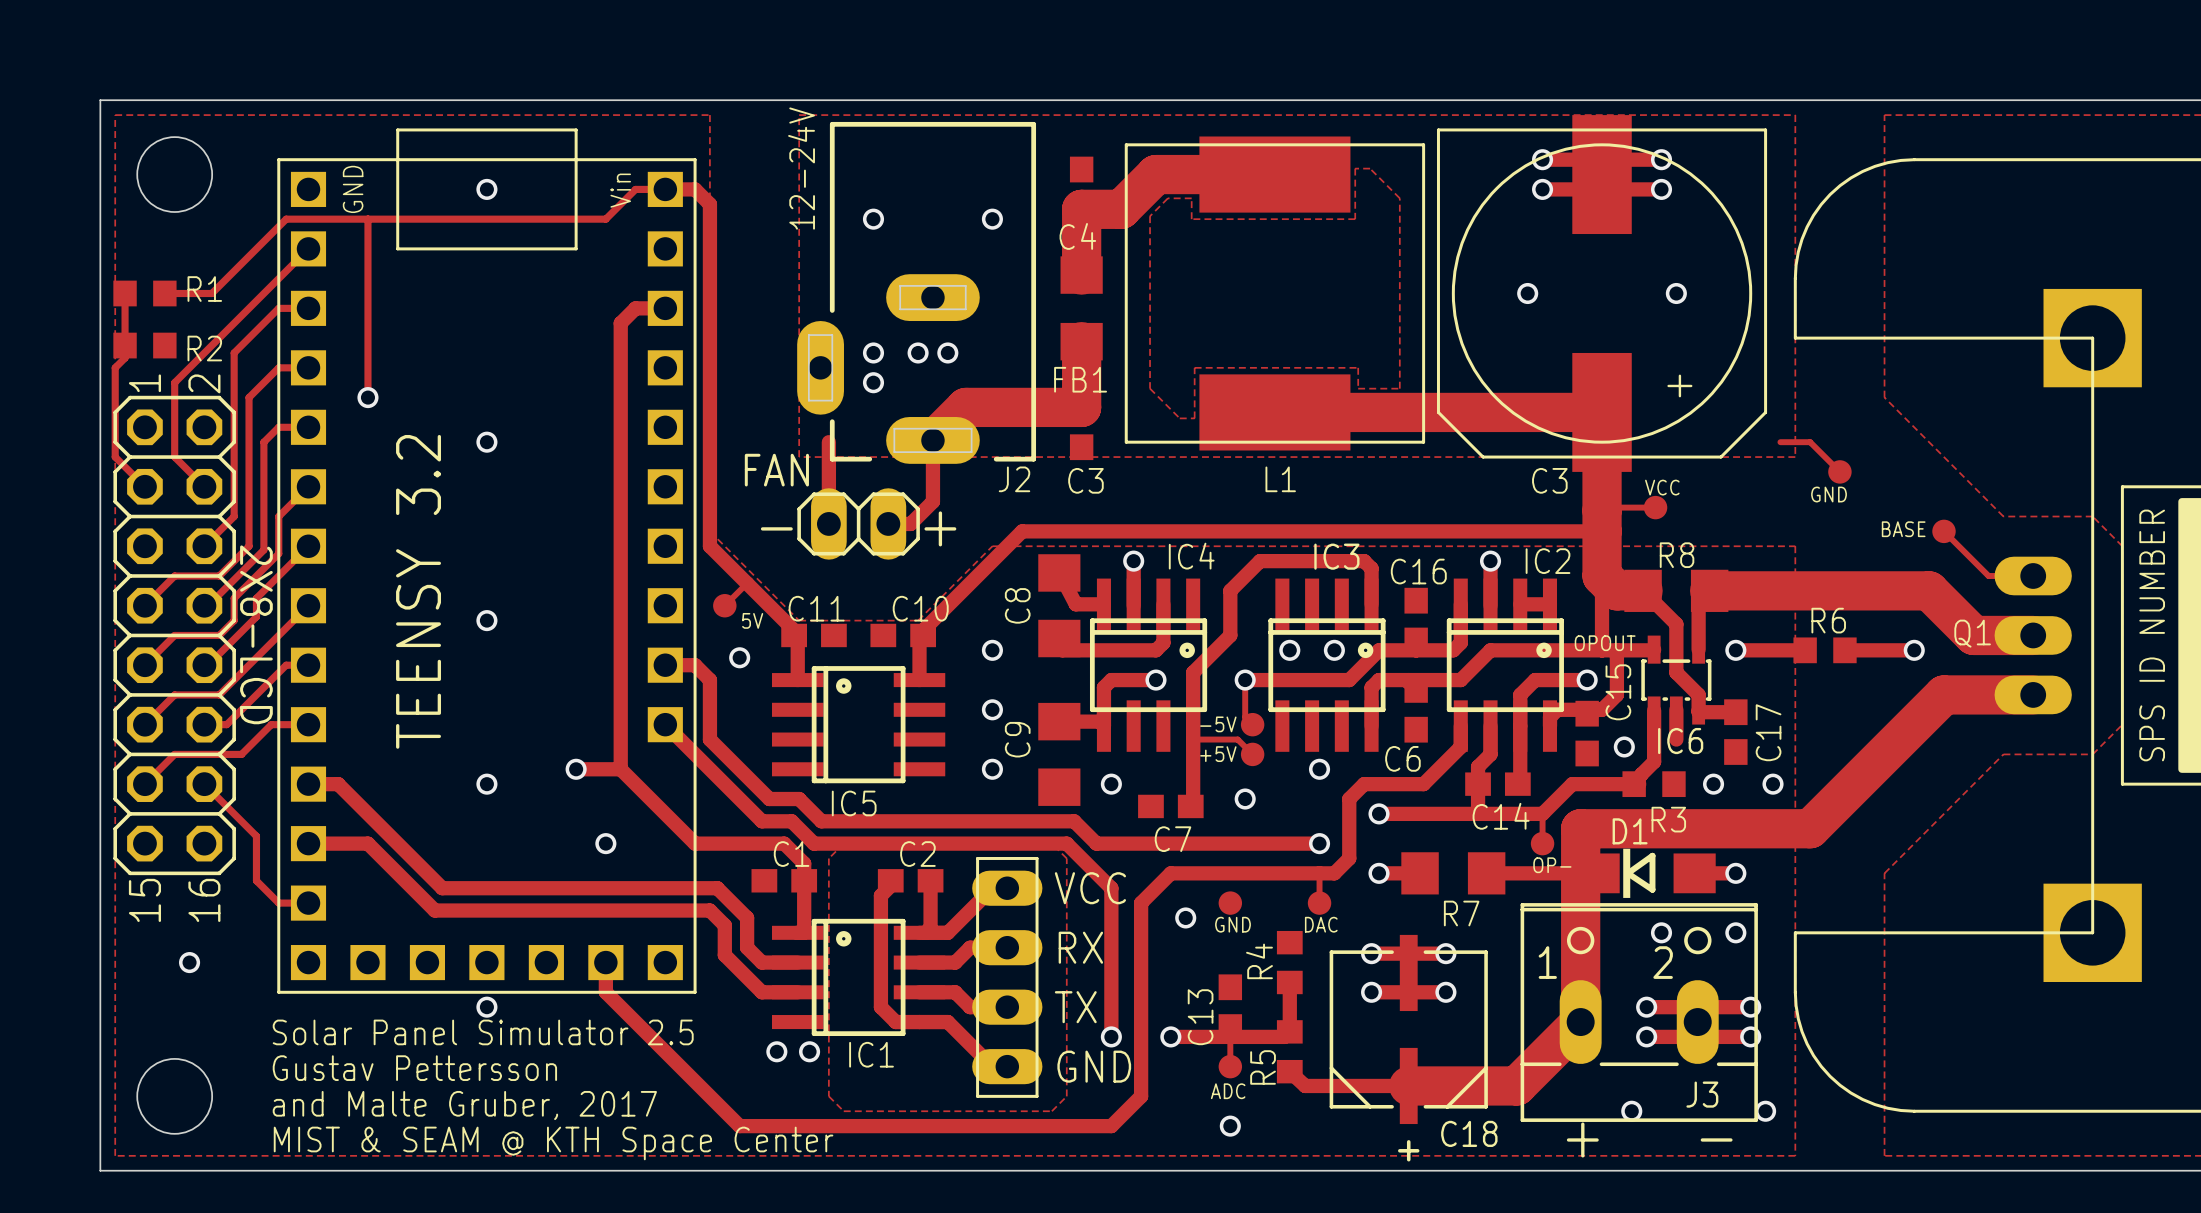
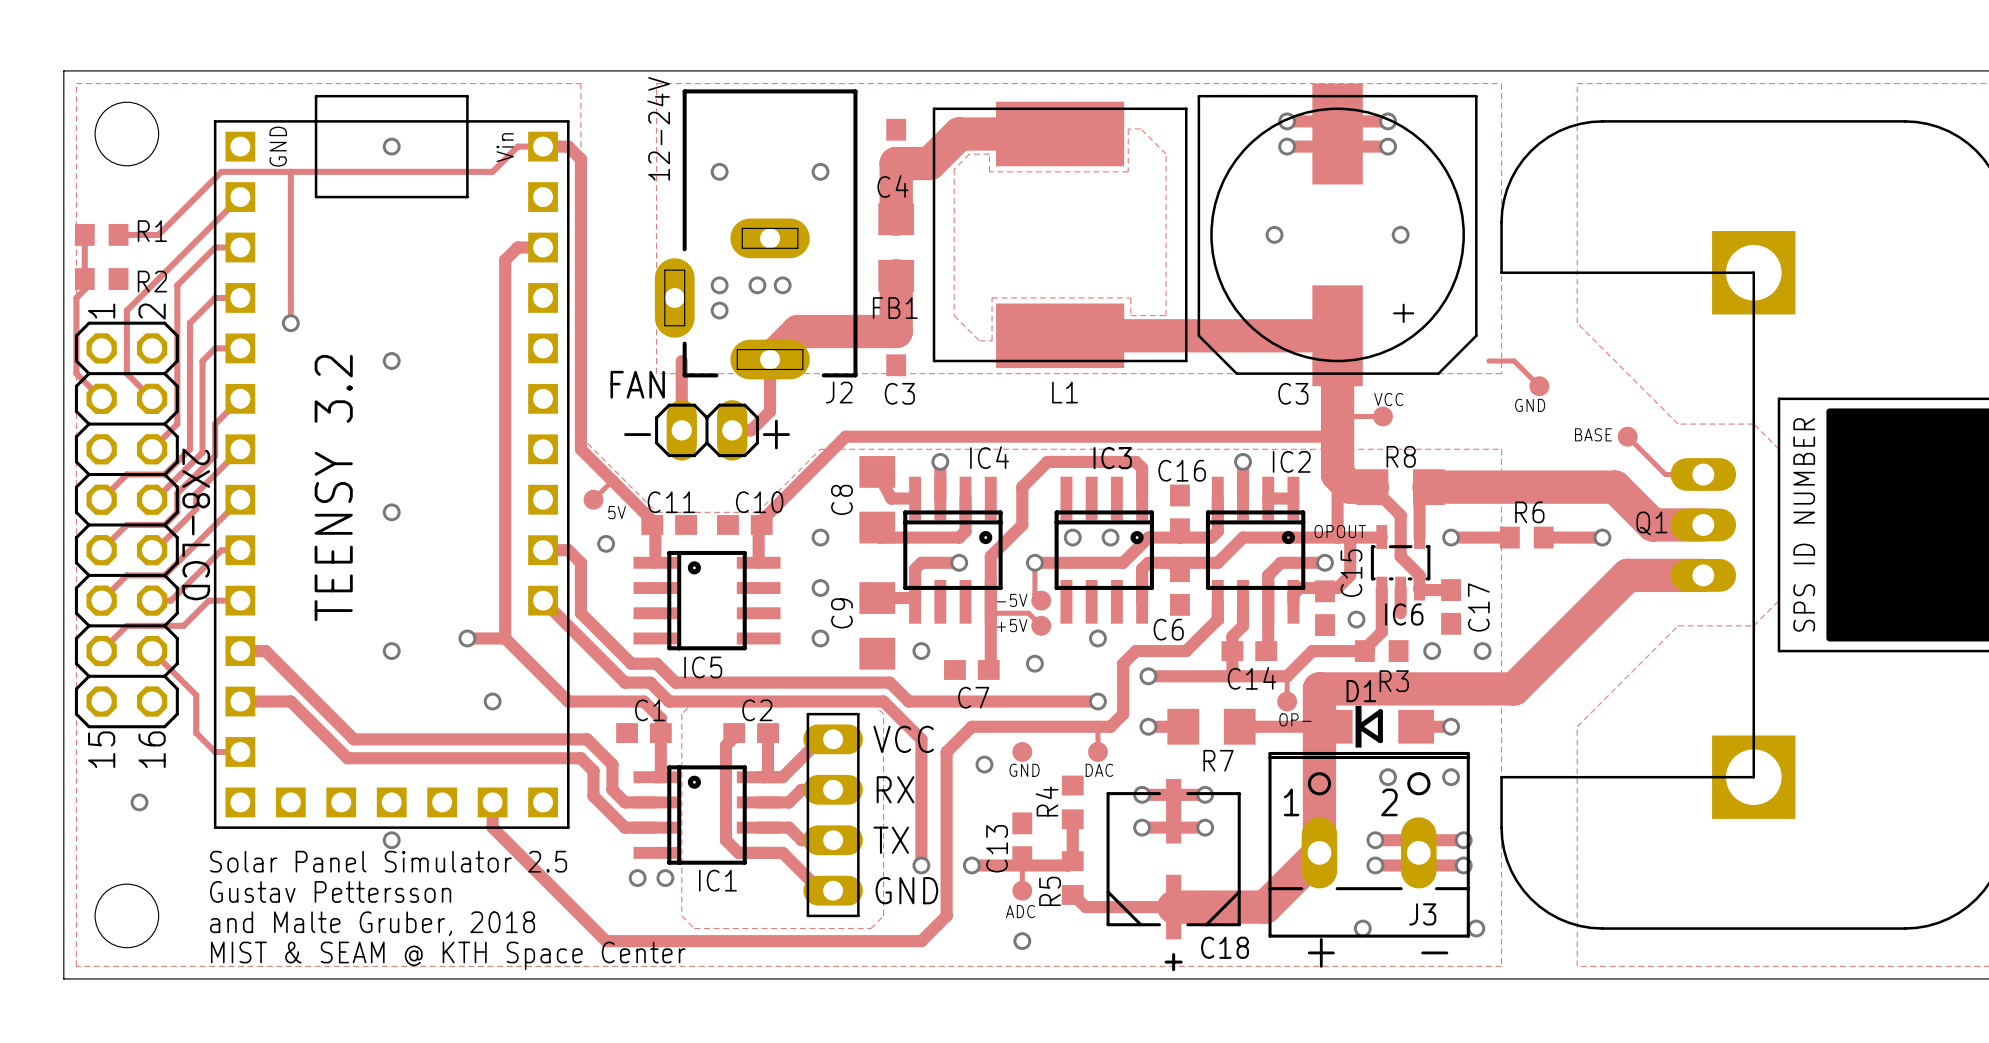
text: and Malte Gruber, 2017 (464, 1105) -> and Malte Gruber, 2018 (372, 923)

